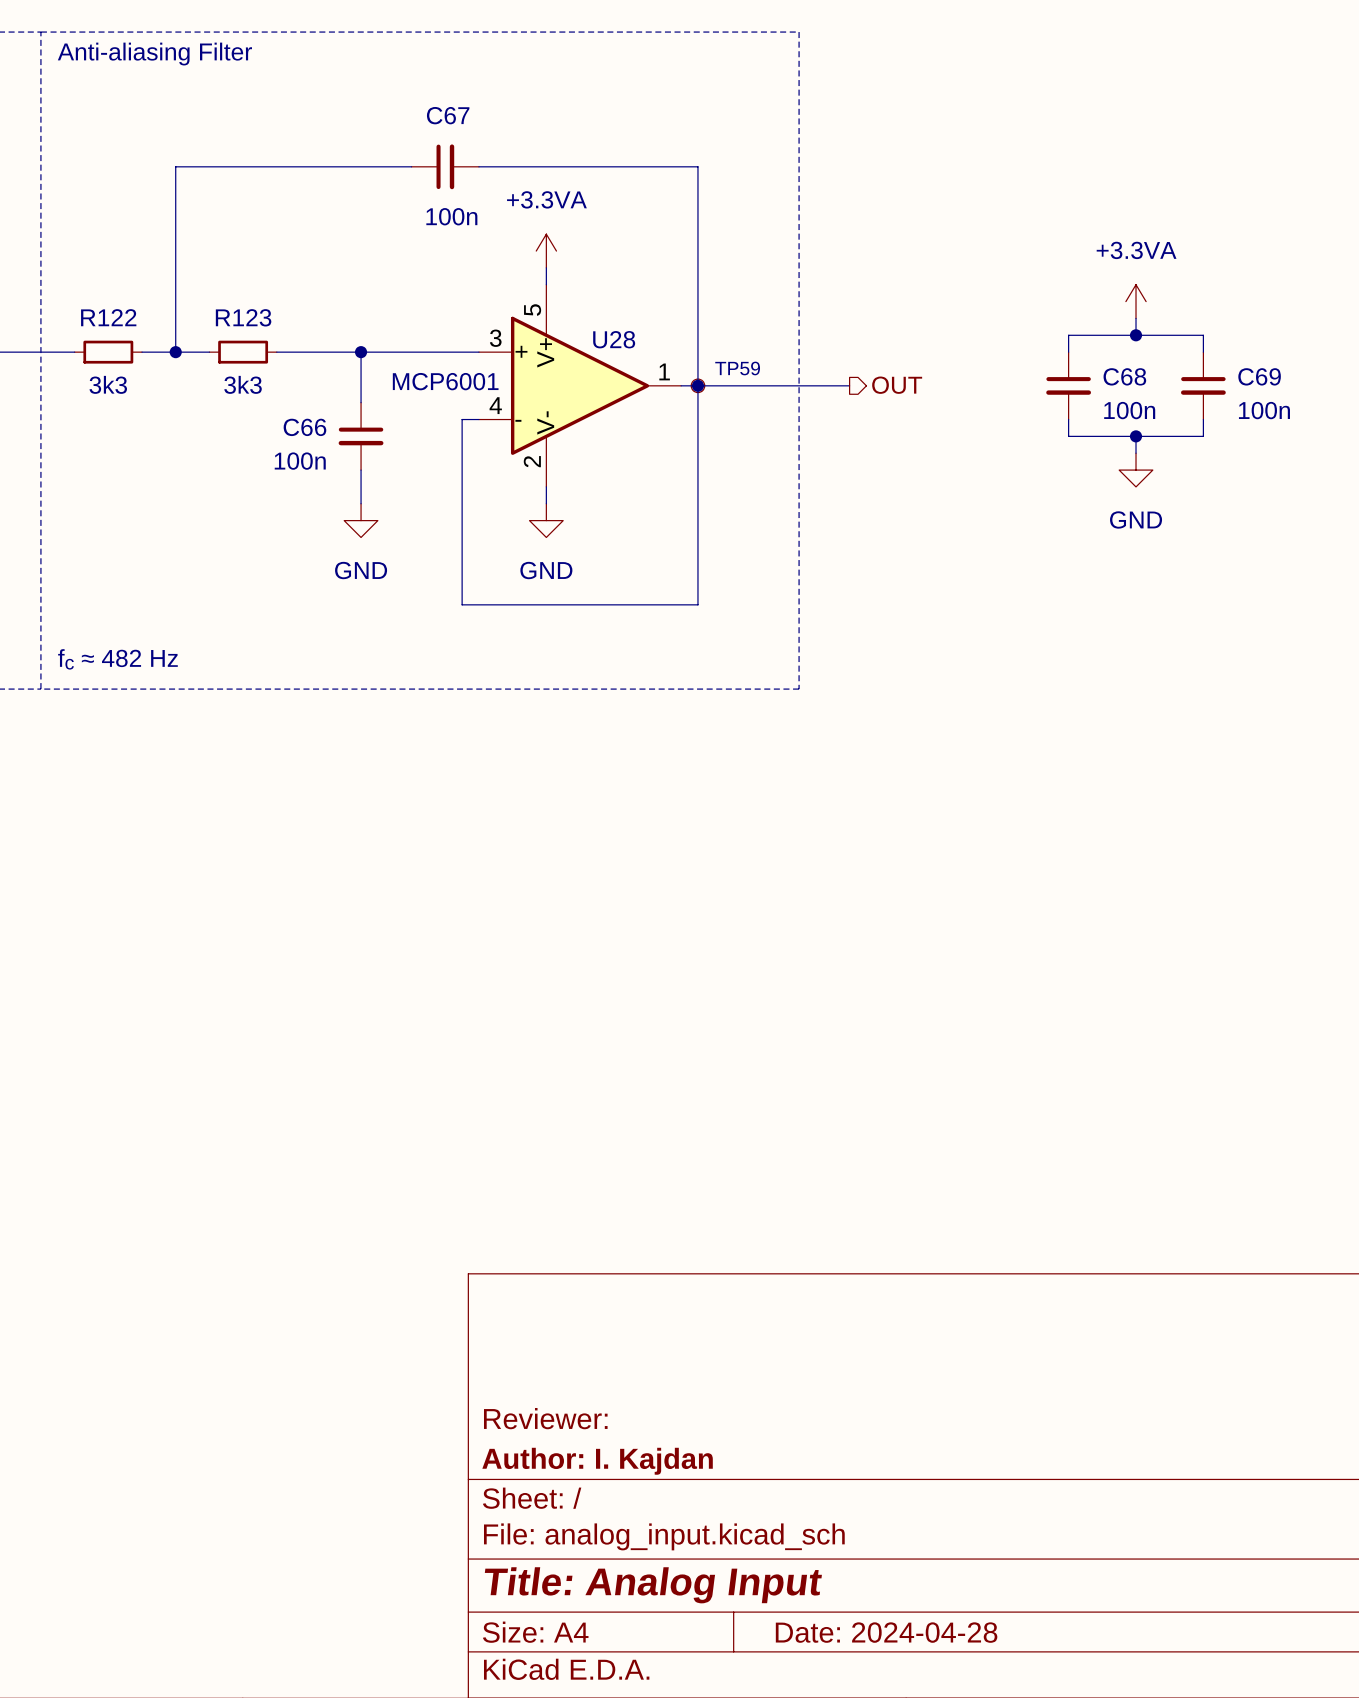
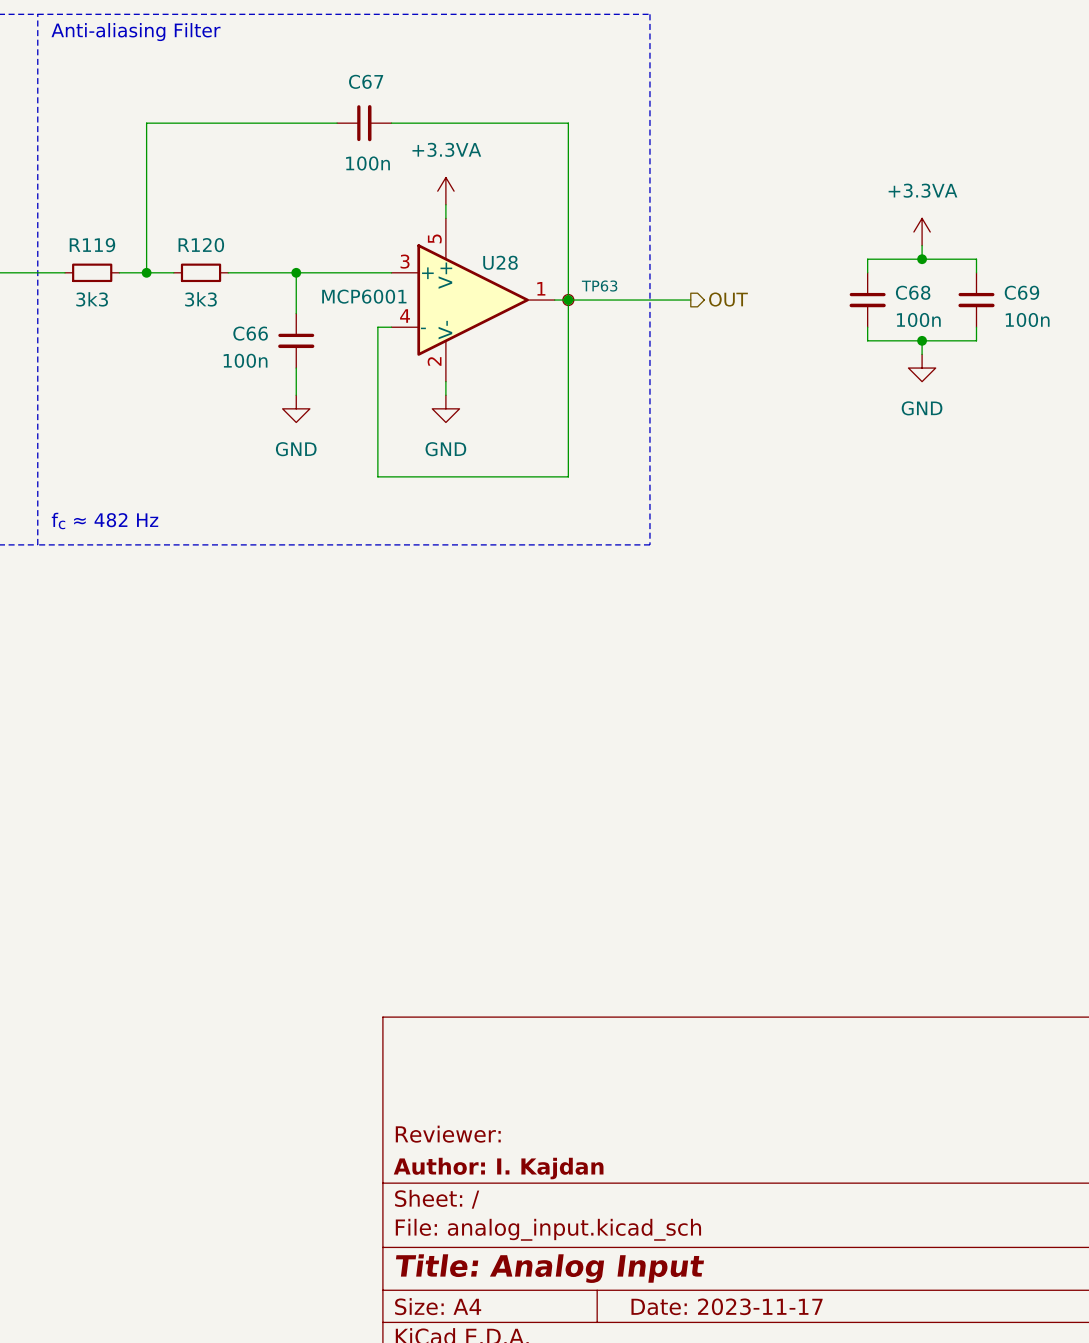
R122 name: R122 (108, 317) -> R119 (92, 245)
R123 name: R123 (243, 317) -> R120 (201, 245)
TP59 name: TP59 (737, 368) -> TP63 (599, 286)
title block: Date: 2024-04-28 (886, 1632) -> Date: 2023-11-17 (727, 1306)

